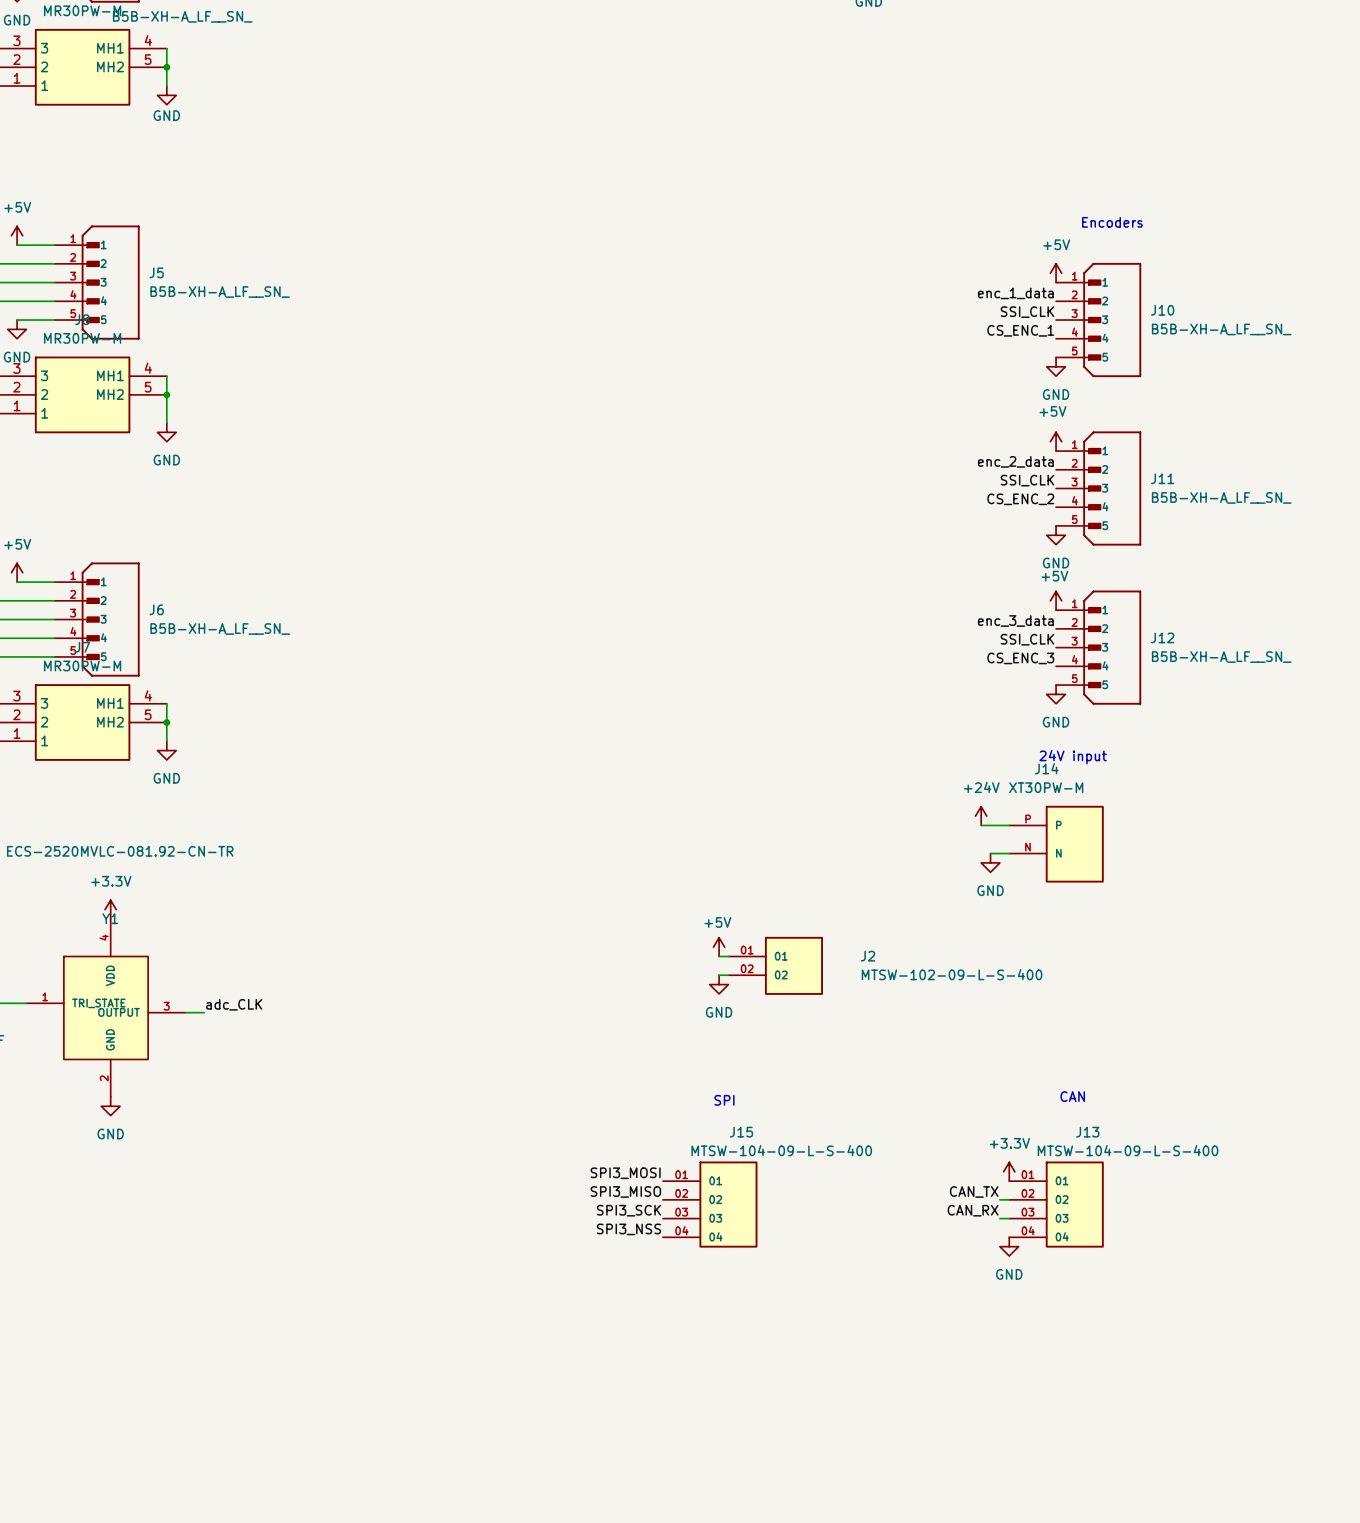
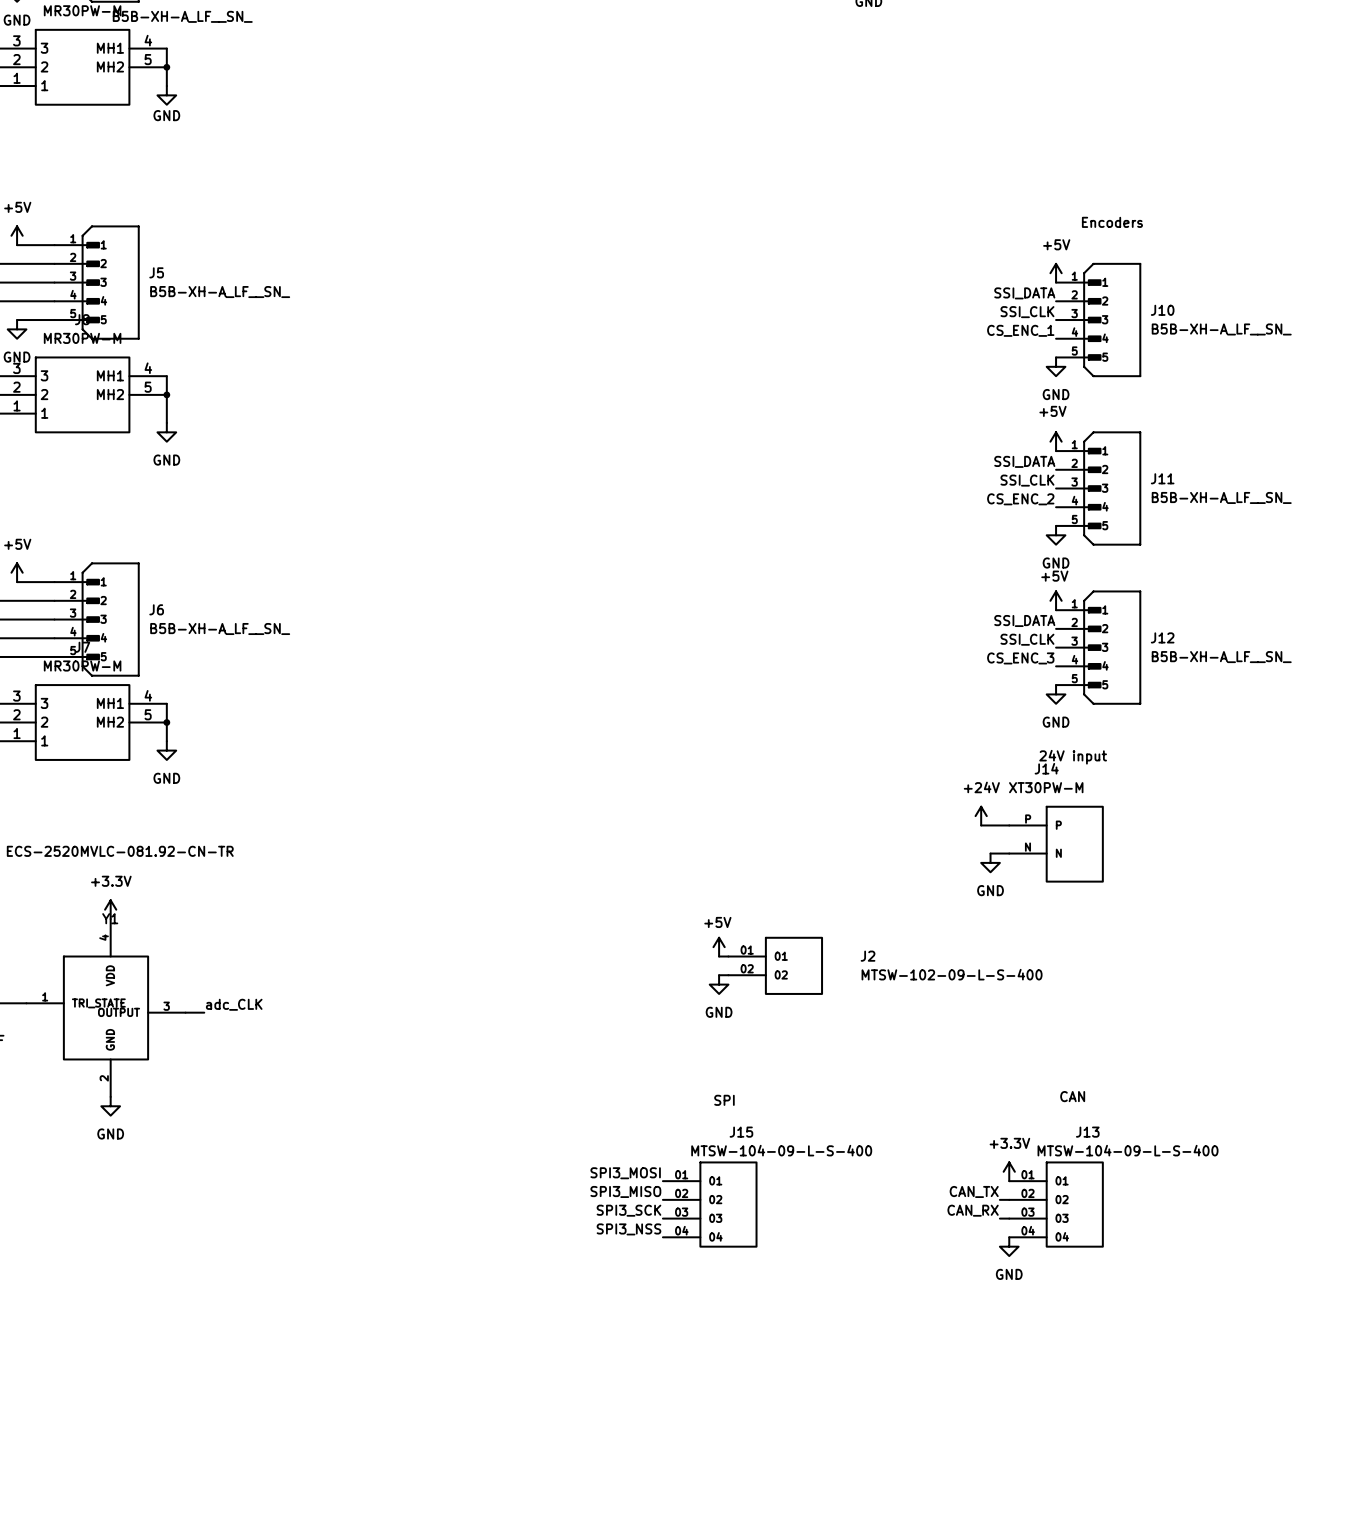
label: enc_1_data (1015, 293) -> SSI_DATA (1024, 293)
label: enc_2_data (1015, 461) -> SSI_DATA (1024, 461)
label: enc_3_data (1015, 620) -> SSI_DATA (1024, 620)

